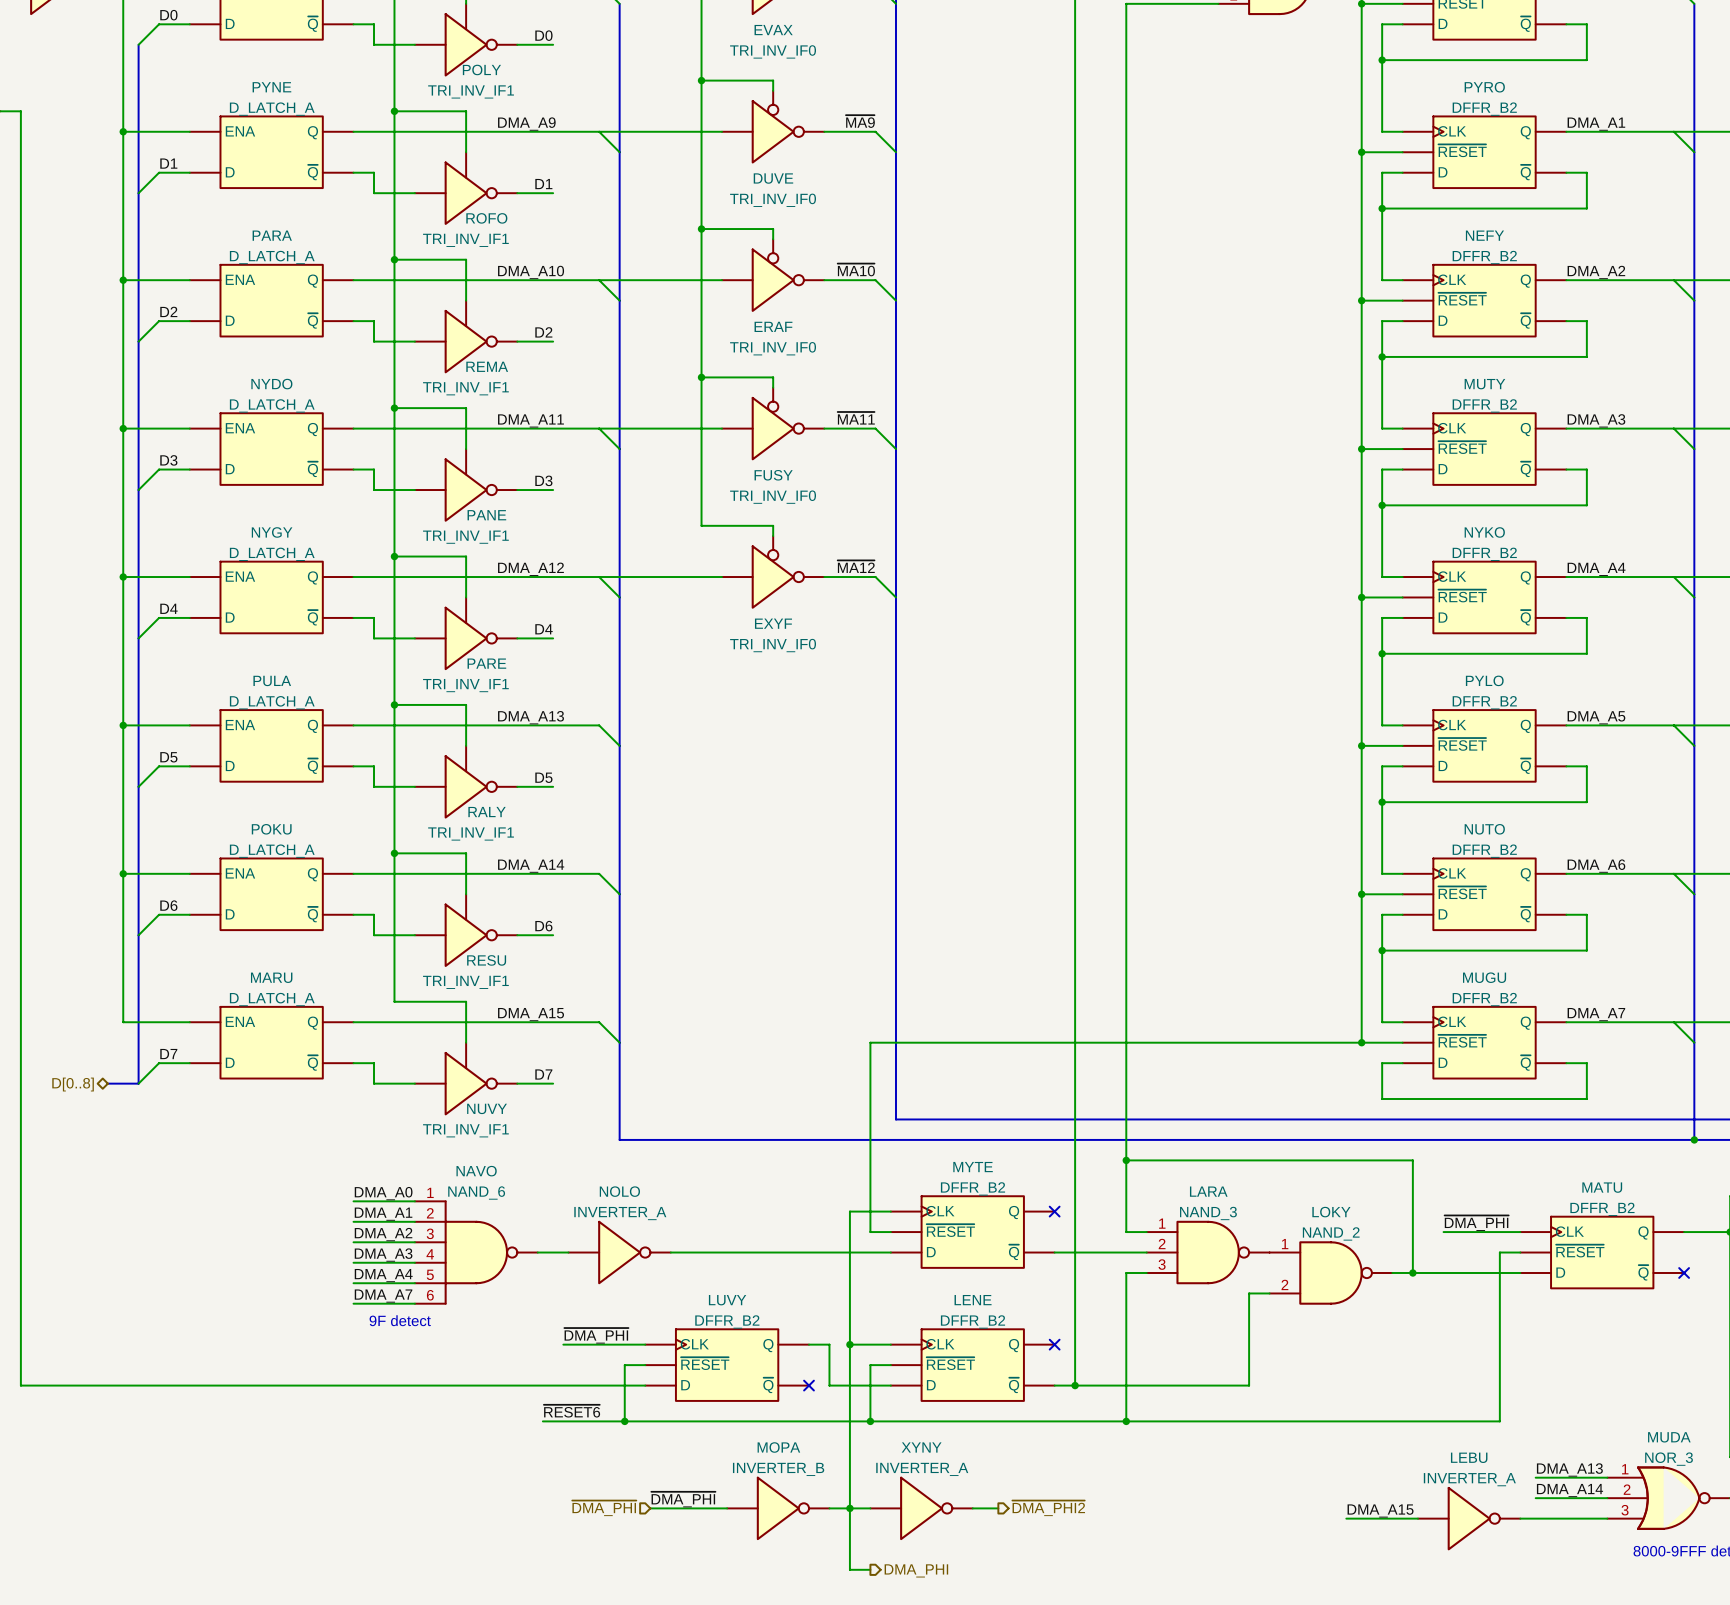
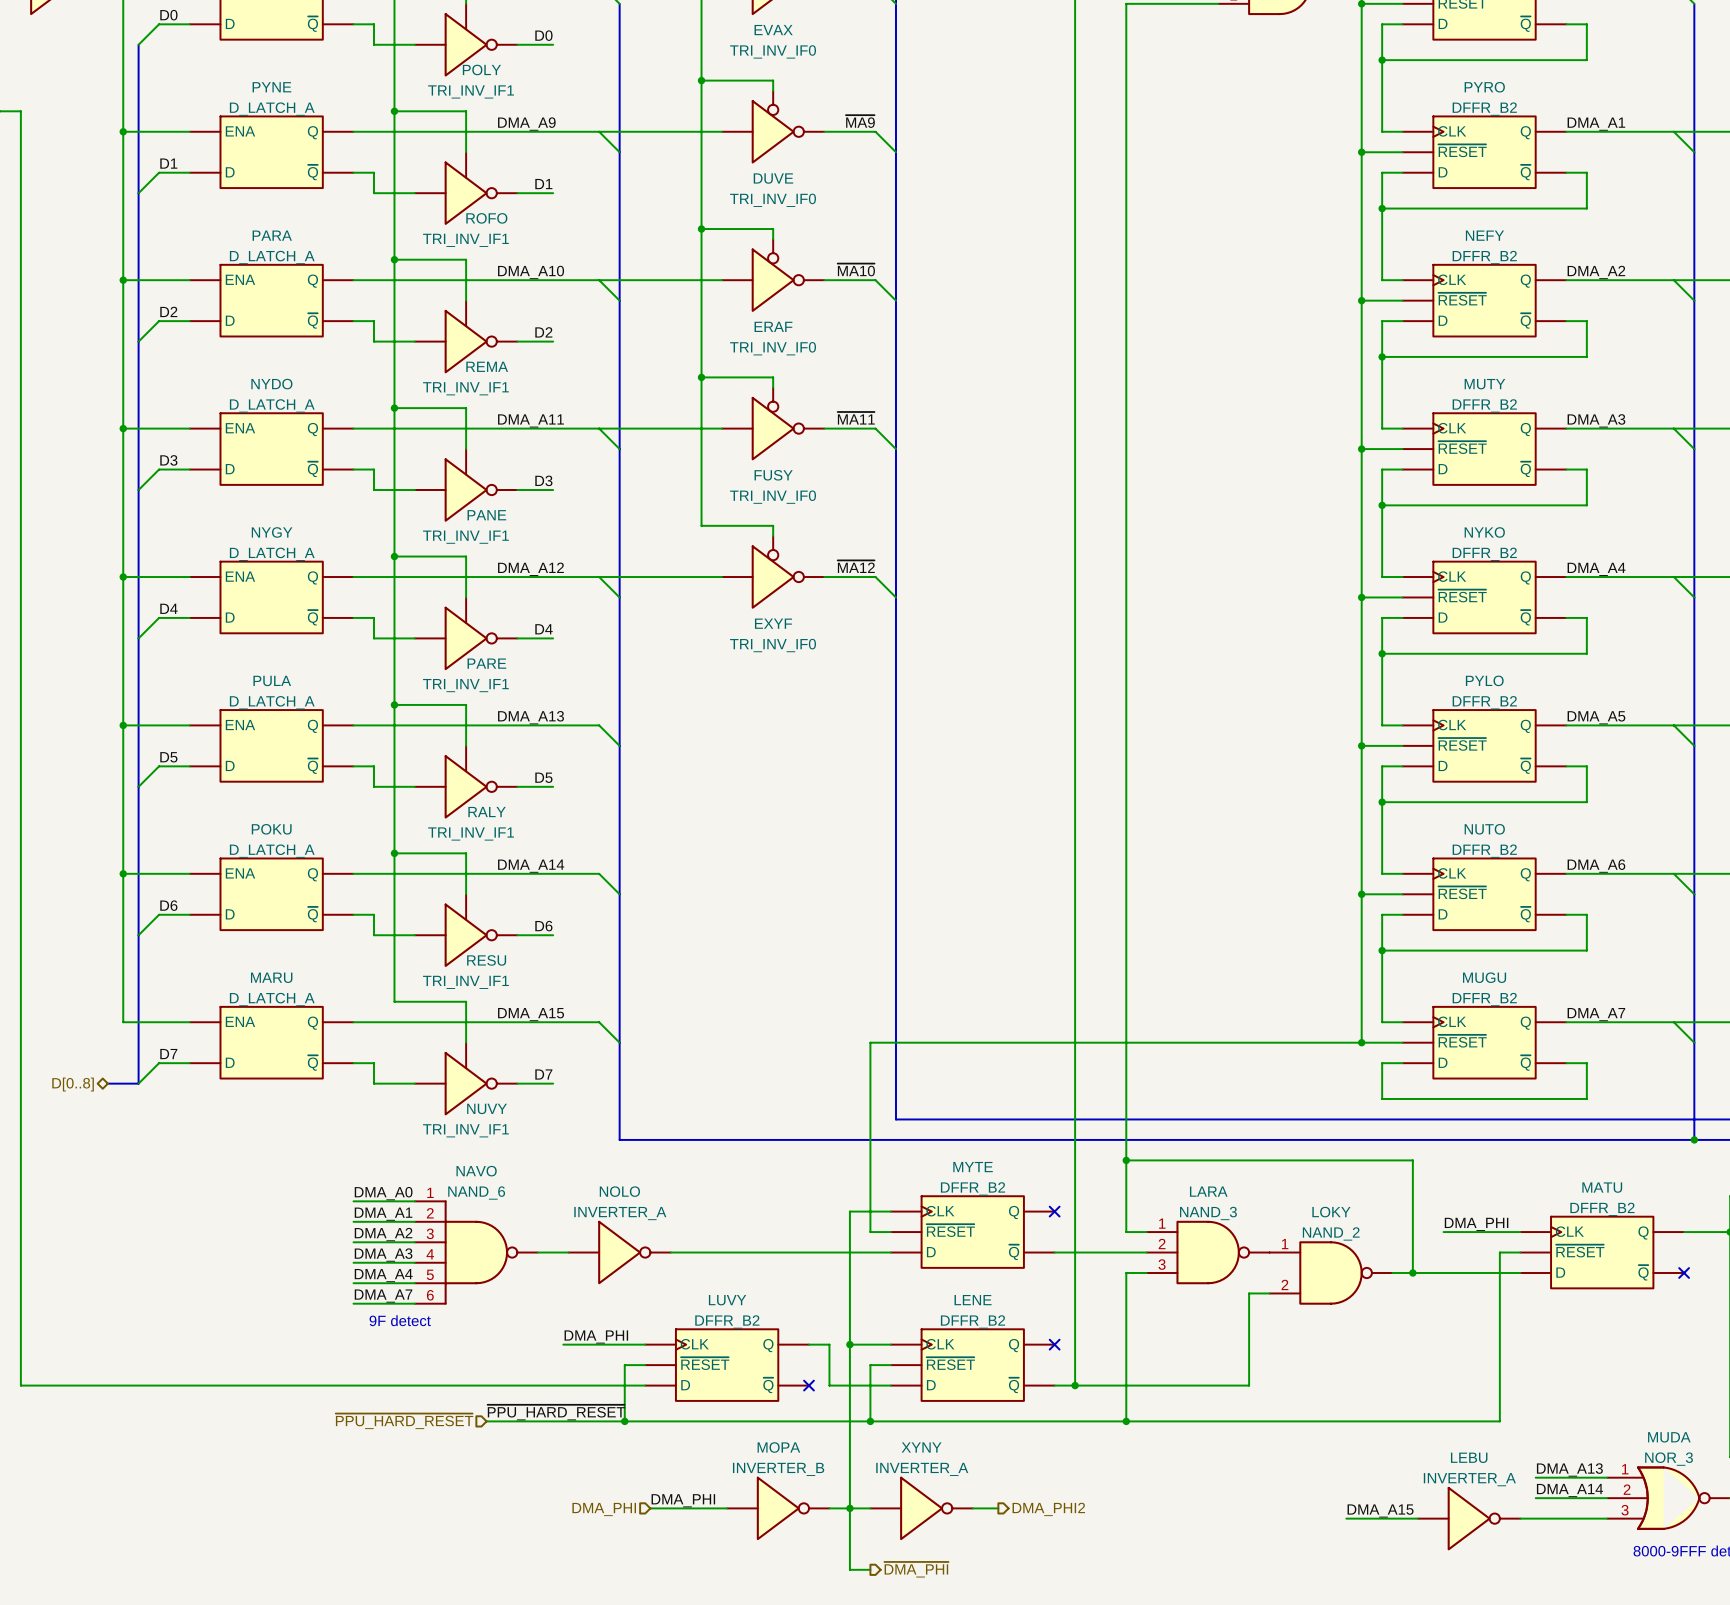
label: ~{DMA_PHI} (1476, 1223) -> DMA_PHI (1476, 1224)
label: ~{DMA_PHI} (596, 1335) -> DMA_PHI (596, 1336)
label: ~{RESET6} (572, 1411) -> ~{PPU_HARD_RESET} (556, 1412)
hierarchical label: none -> ~{PPU_HARD_RESET} (404, 1421)
wire: none -> (486, 1421) (542, 1421)
label: ~{DMA_PHI} (683, 1499) -> DMA_PHI (683, 1500)
hierarchical label: ~{DMA_PHI} (604, 1508) -> DMA_PHI (604, 1509)
hierarchical label: ~{DMA_PHI2} (1048, 1508) -> DMA_PHI2 (1048, 1509)
hierarchical label: DMA_PHI (916, 1570) -> ~{DMA_PHI} (916, 1569)

